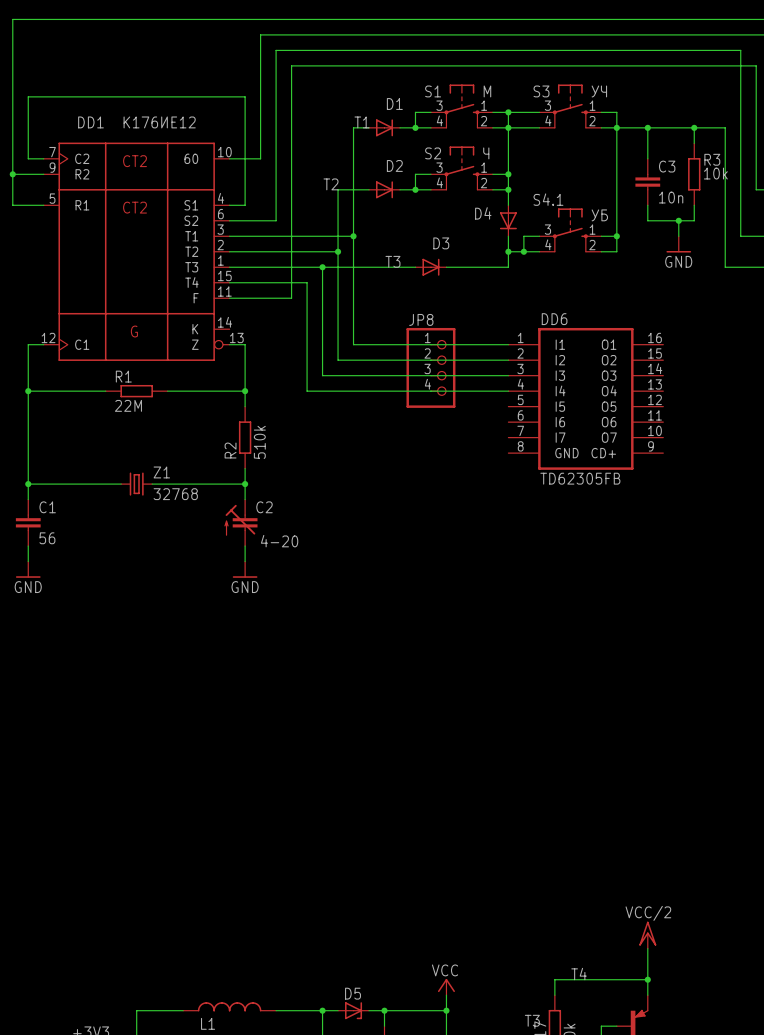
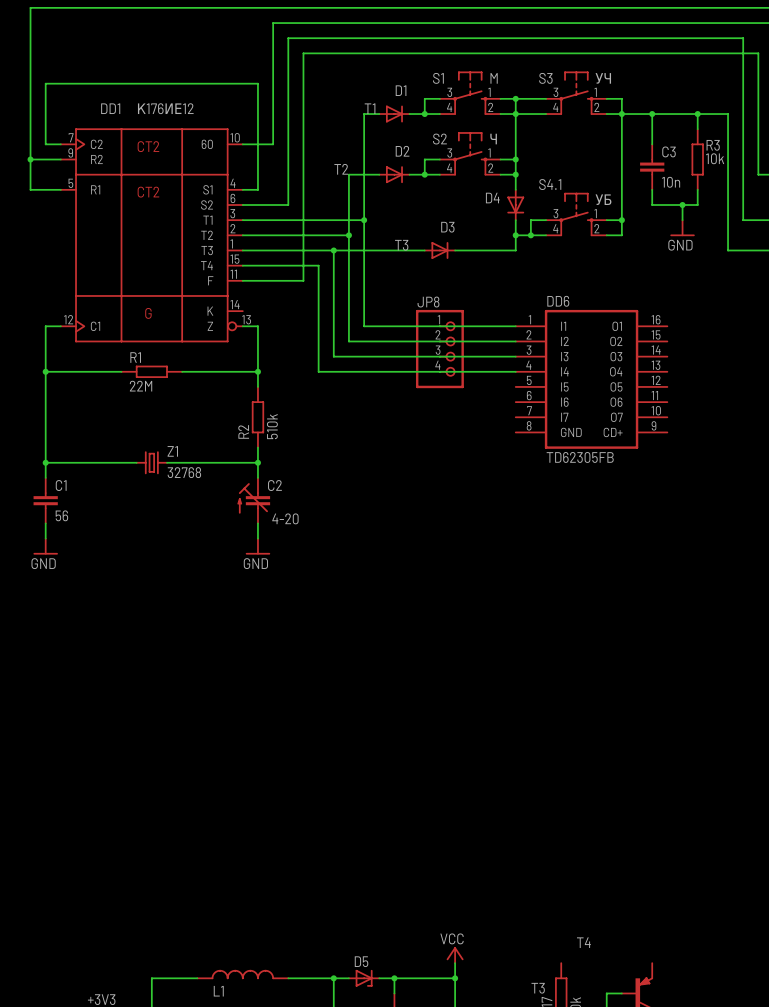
power symbol: VCC/2 (647, 935) -> none
wire: (647, 948) (647, 995) -> none
wire: (647, 979) (554, 979) (554, 995) -> none
junction: (647, 979) -> none

